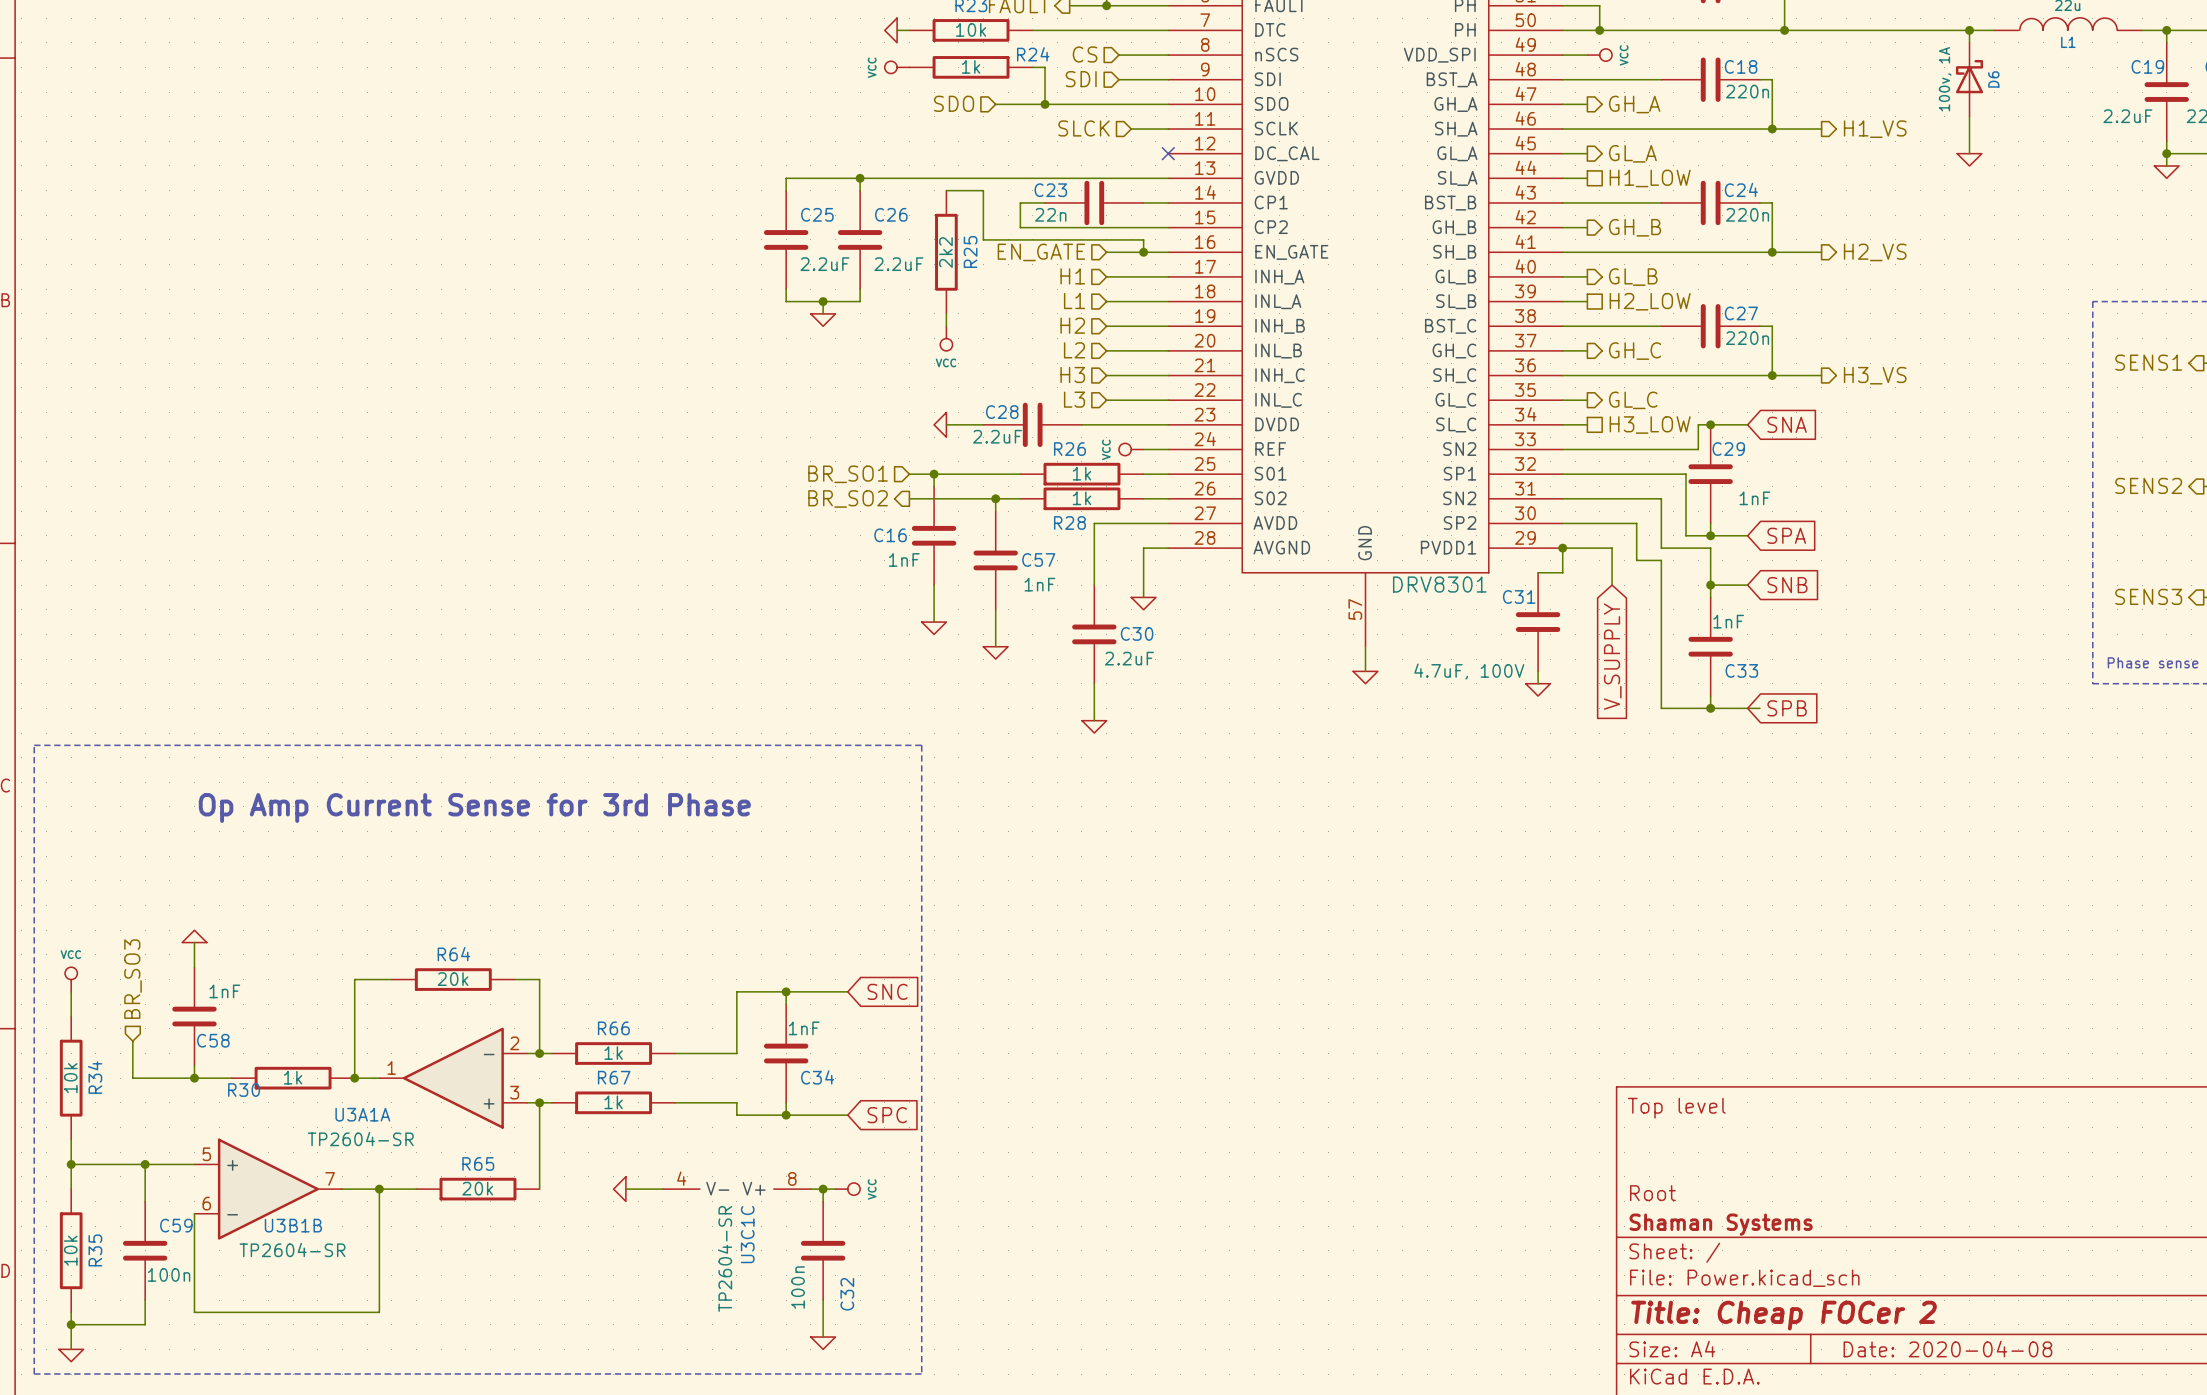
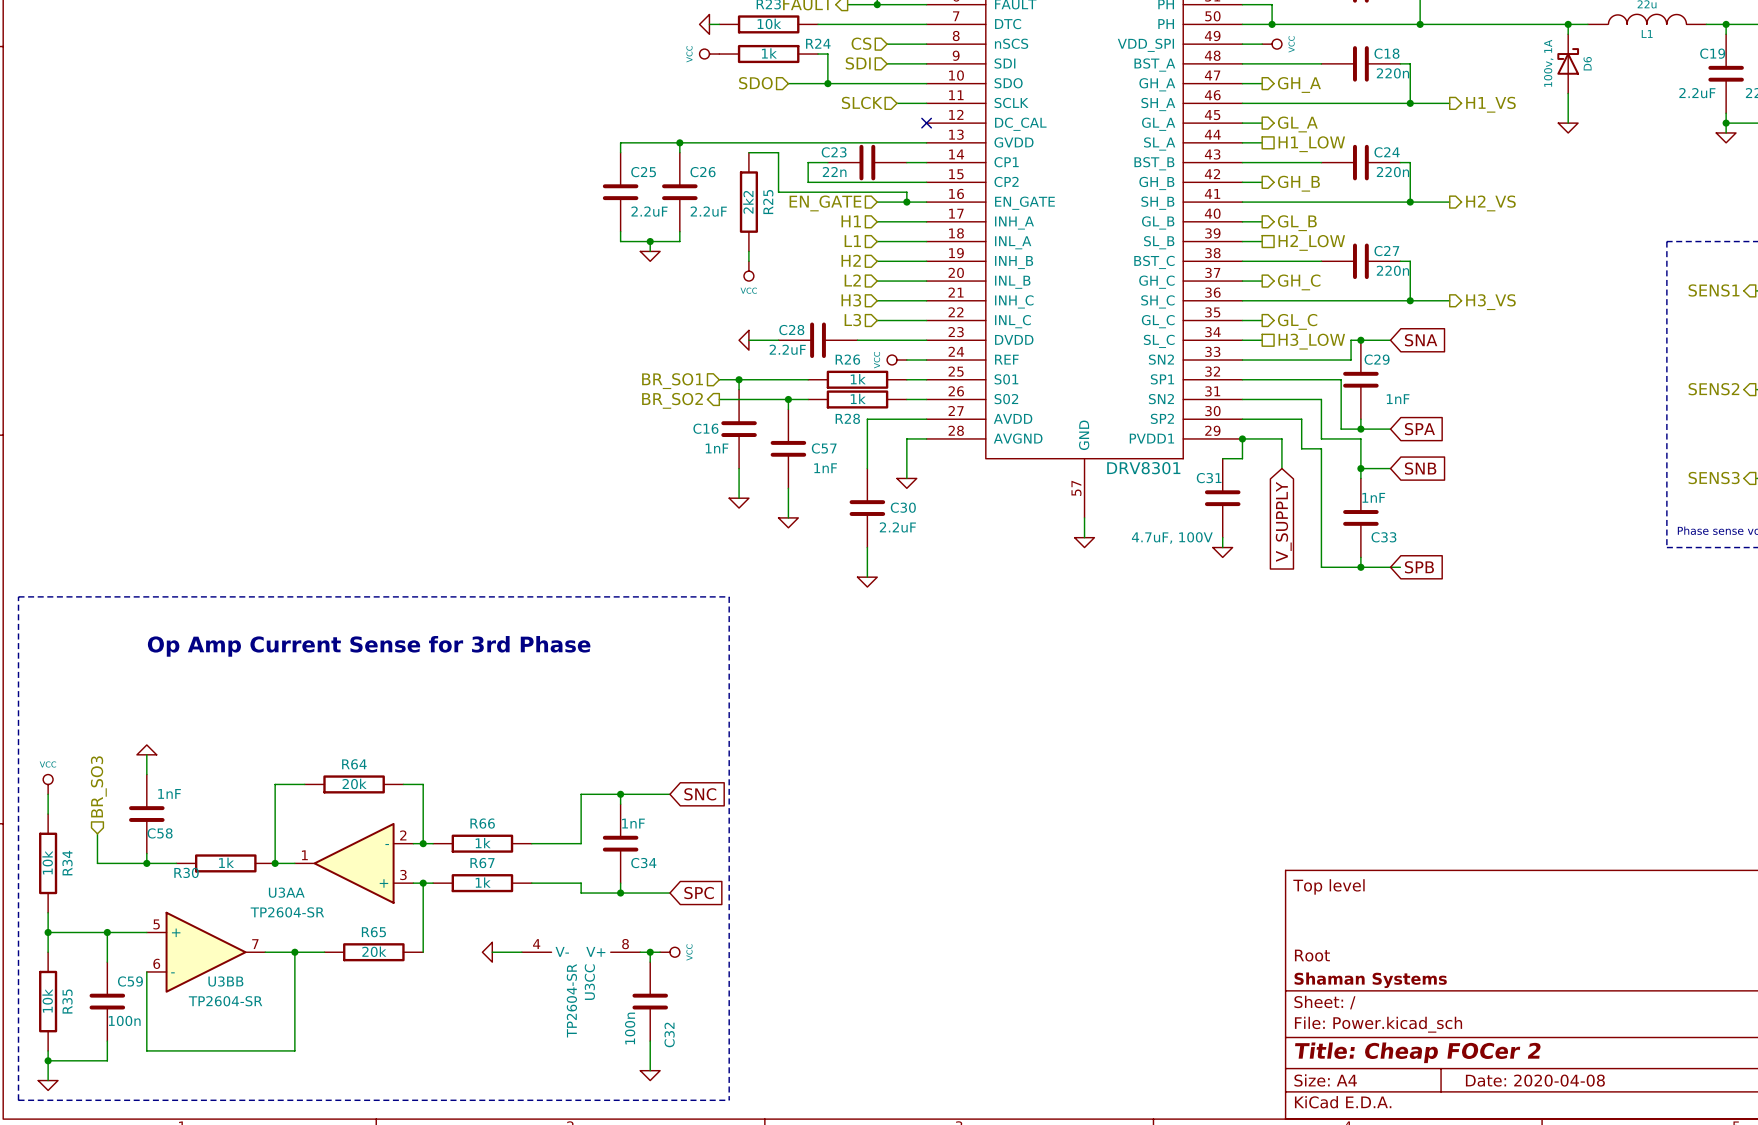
U3A1A name: U3A1A (362, 1114) -> U3AA (286, 892)
U3B1B name: U3B1B (293, 1225) -> U3BB (225, 981)
U3C1C name: U3C1C (747, 1234) -> U3CC (589, 982)

